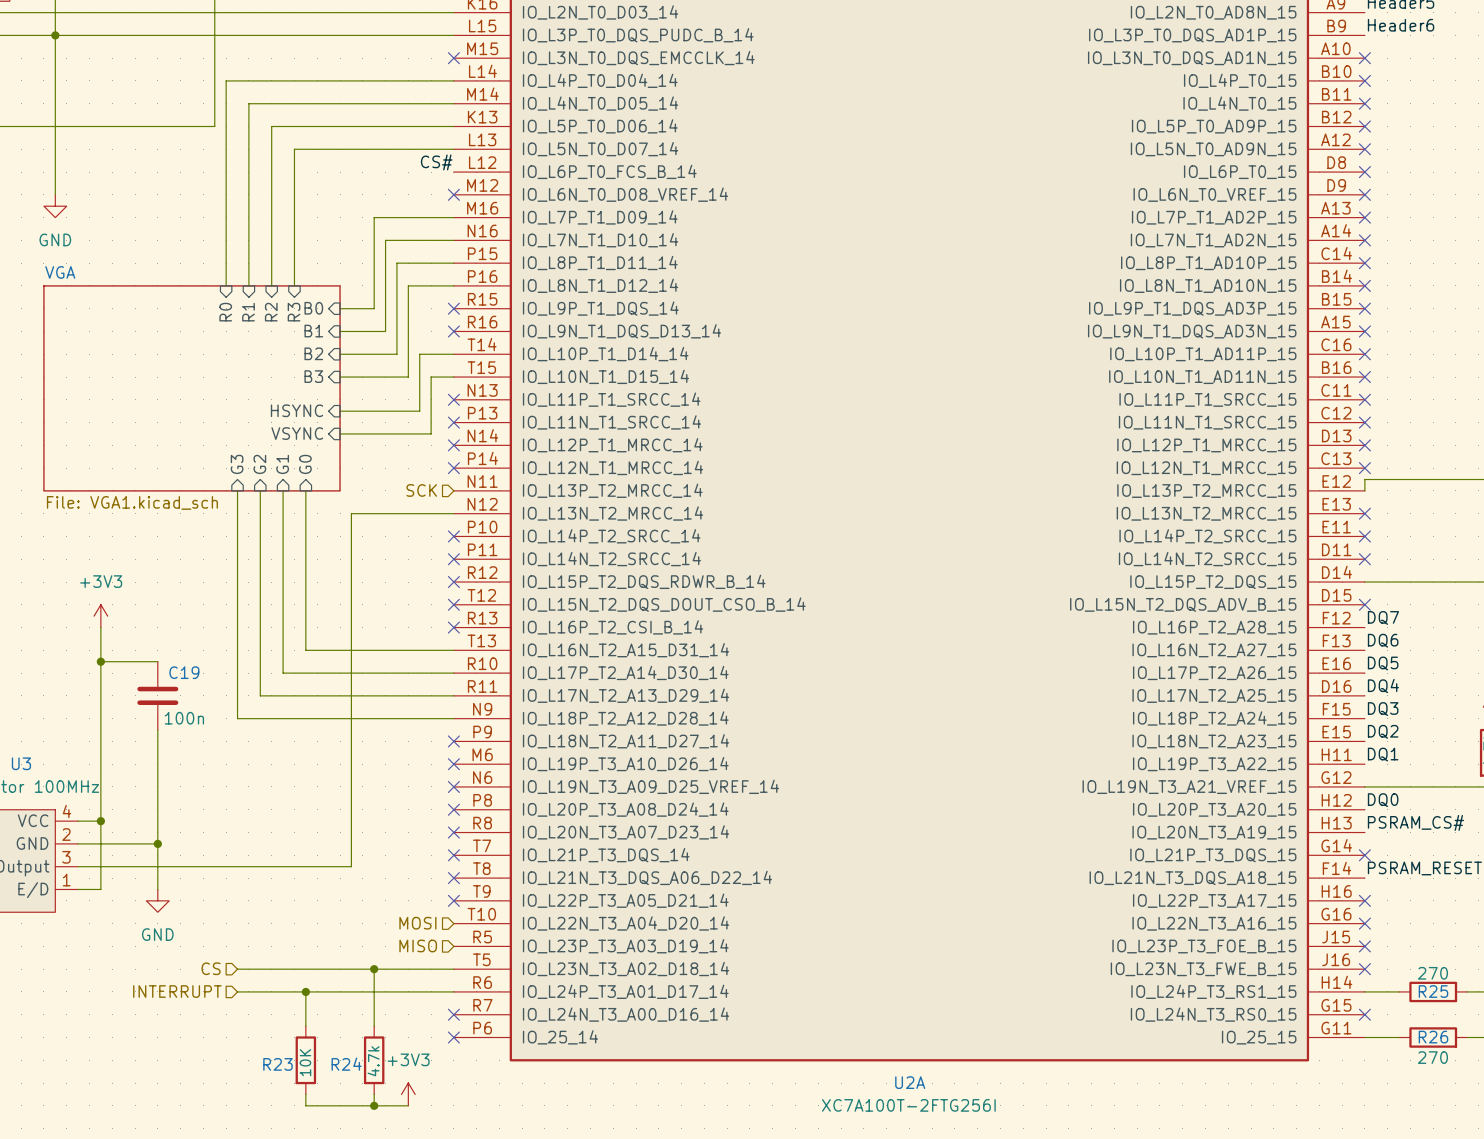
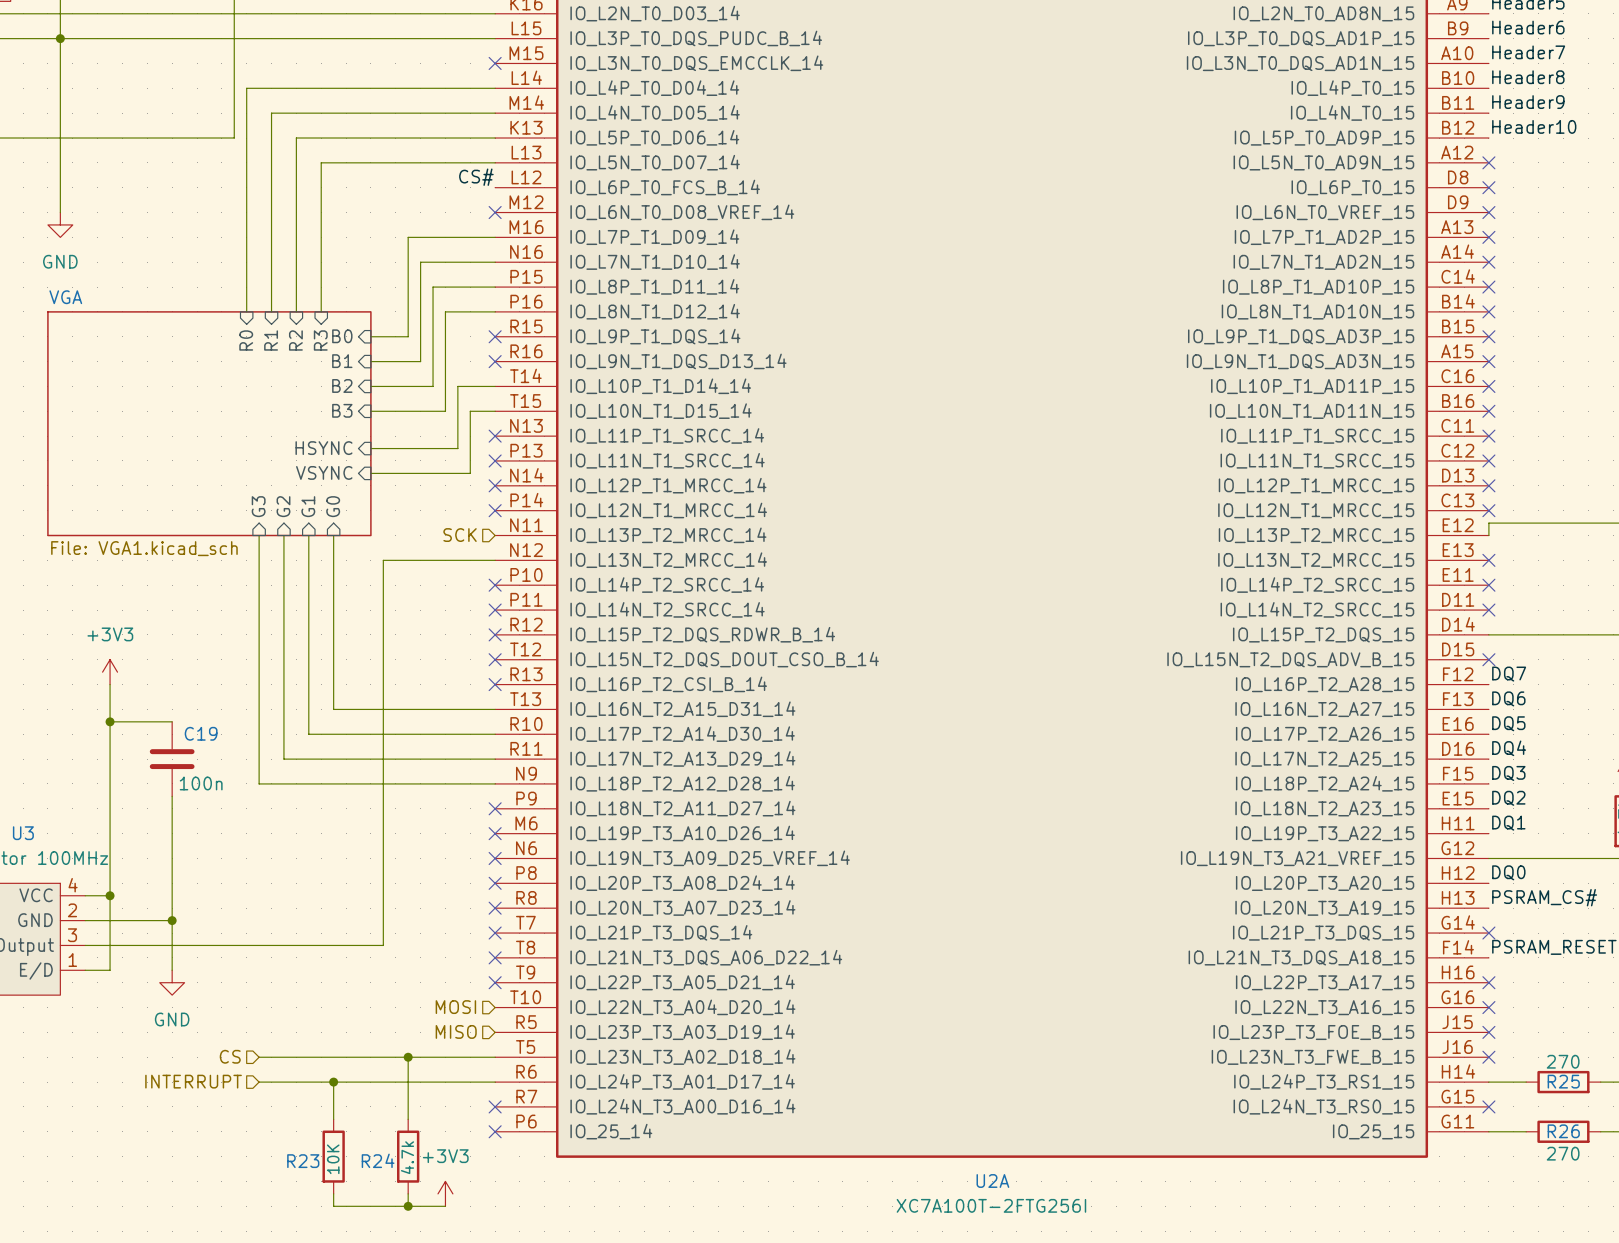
label: none -> Header7 (1528, 52)
no-connect mark: (1364, 58) -> none
label: none -> Header8 (1528, 77)
no-connect mark: (1364, 80) -> none
label: none -> Header9 (1528, 102)
no-connect mark: (1364, 103) -> none
label: none -> Header10 (1534, 126)
no-connect mark: (1364, 126) -> none

